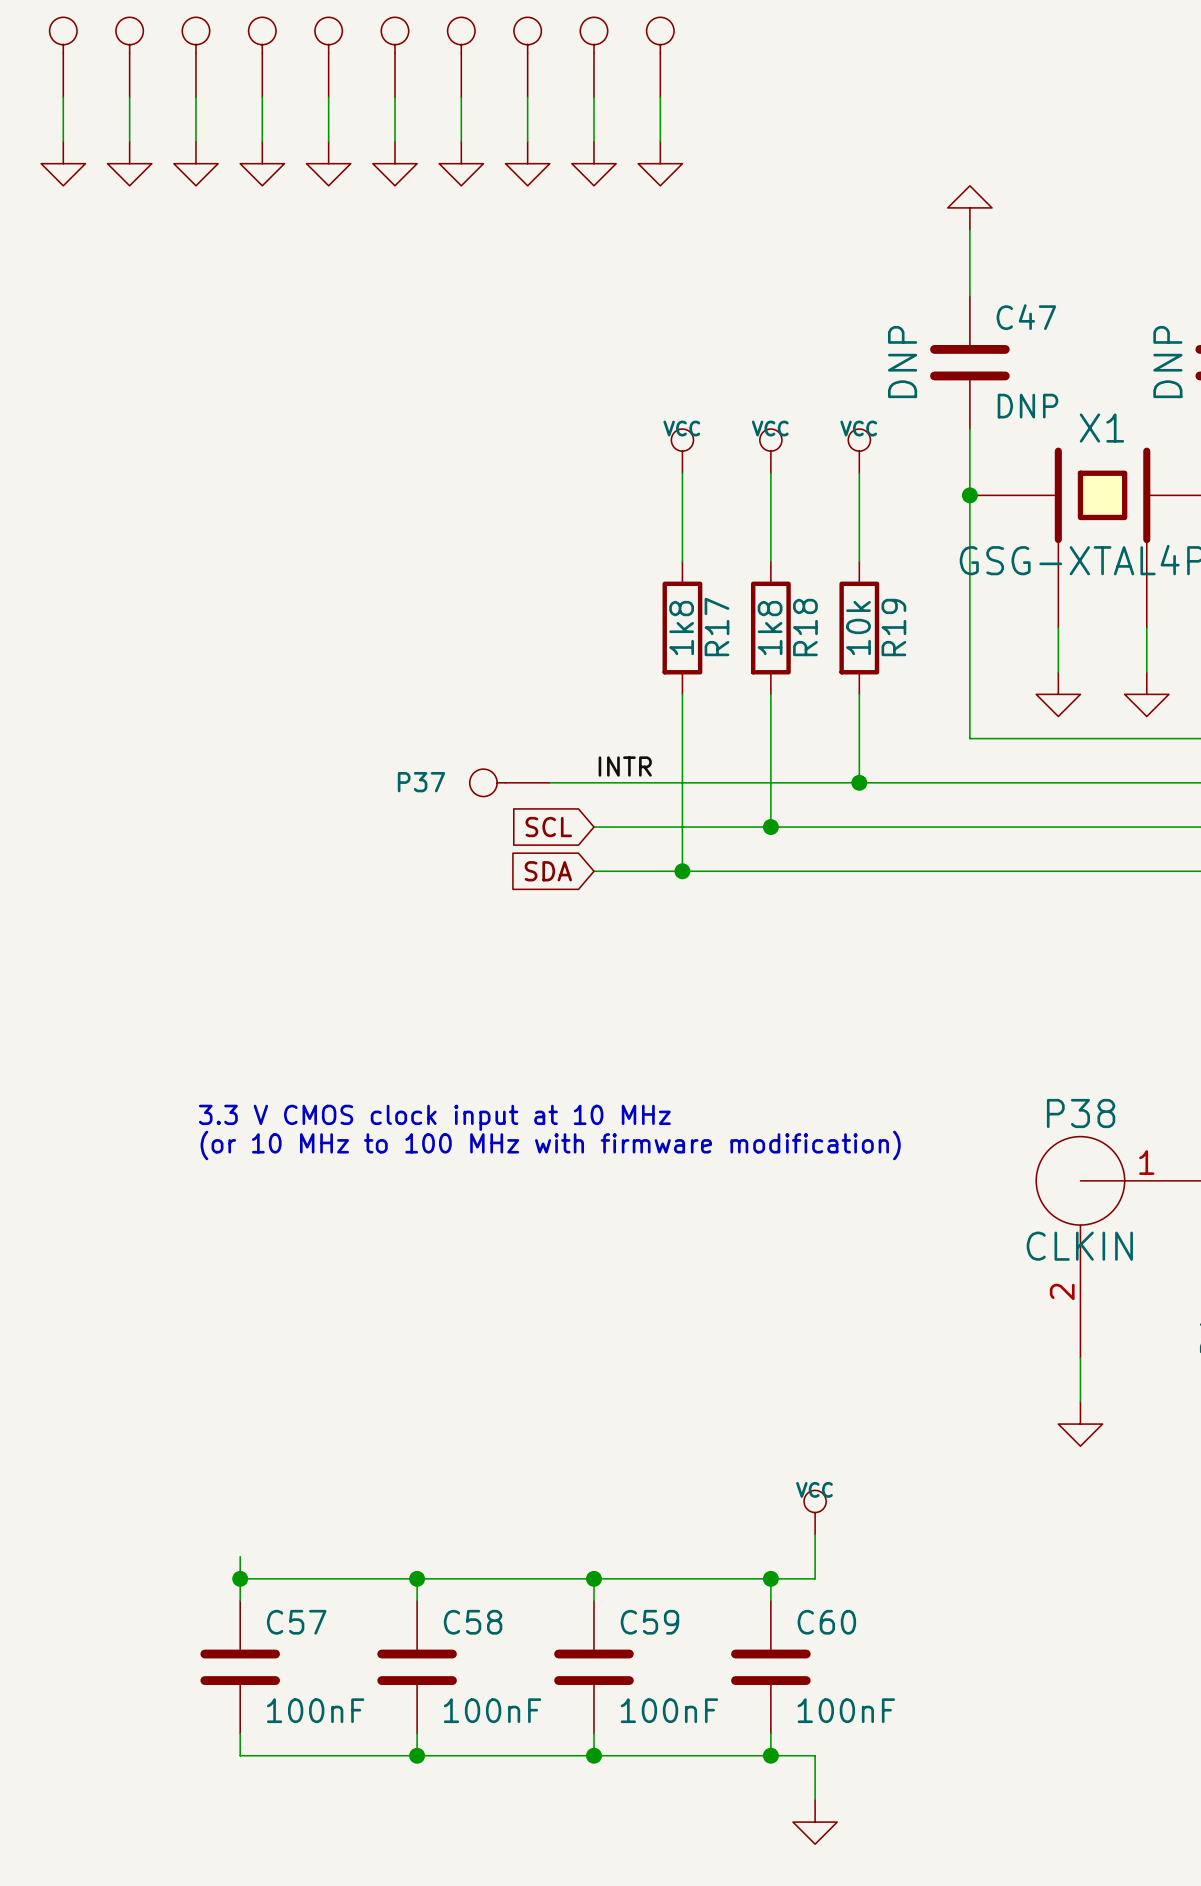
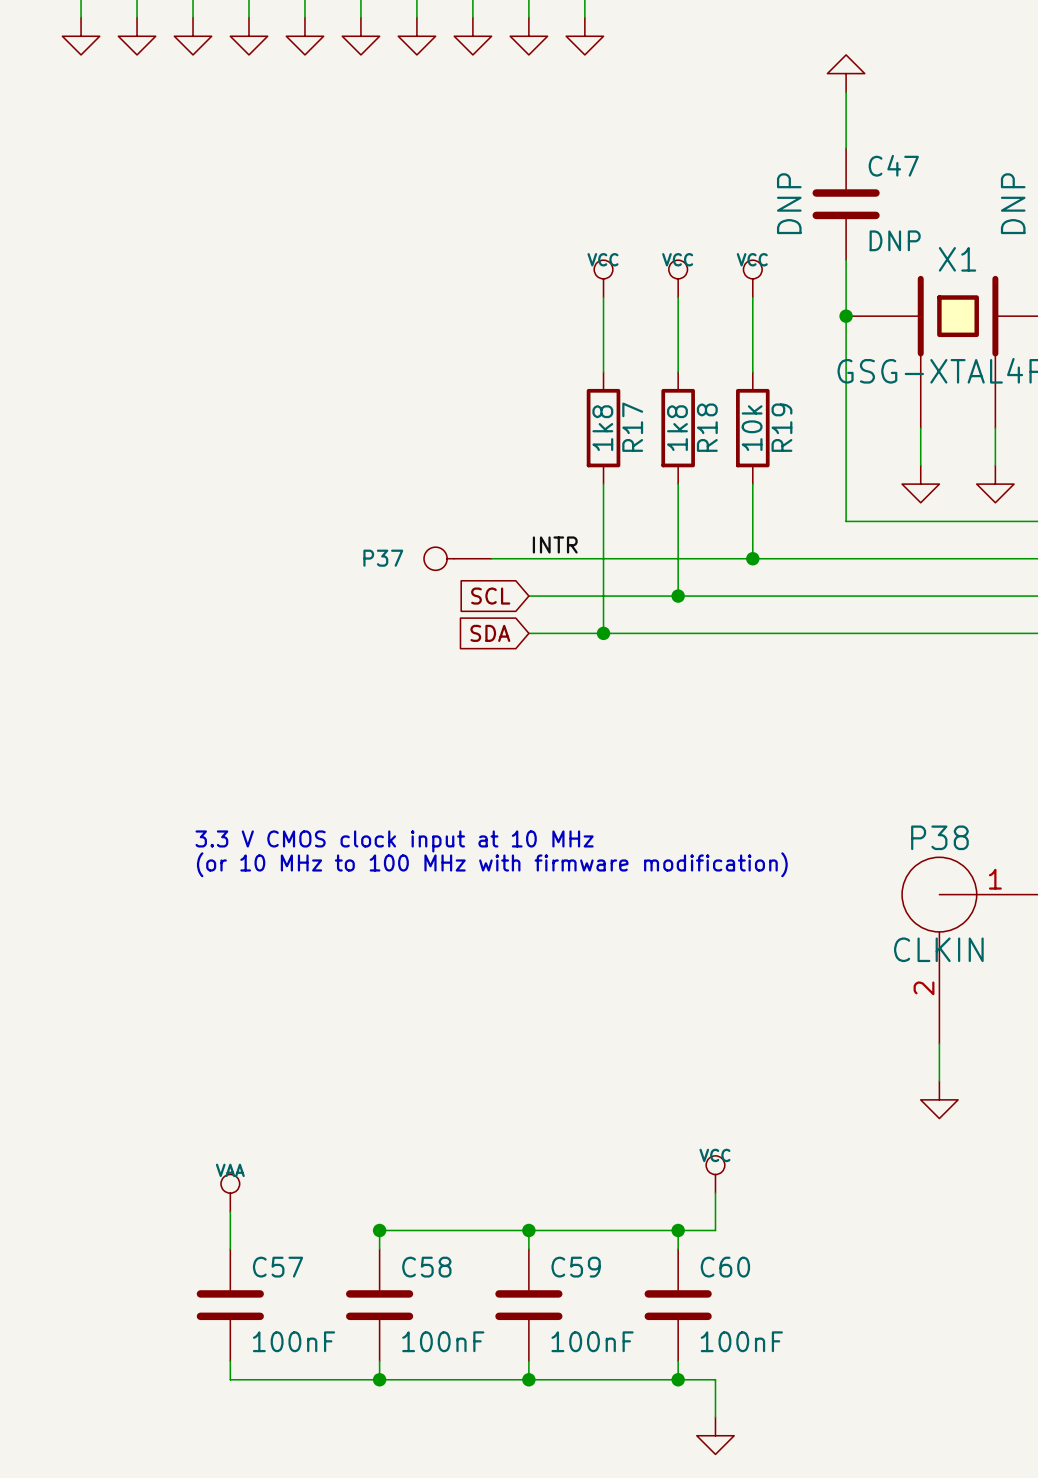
power symbol: none -> VAA (230, 1193)
wire: (240, 1578) (417, 1578) -> none
junction: (240, 1578) -> none

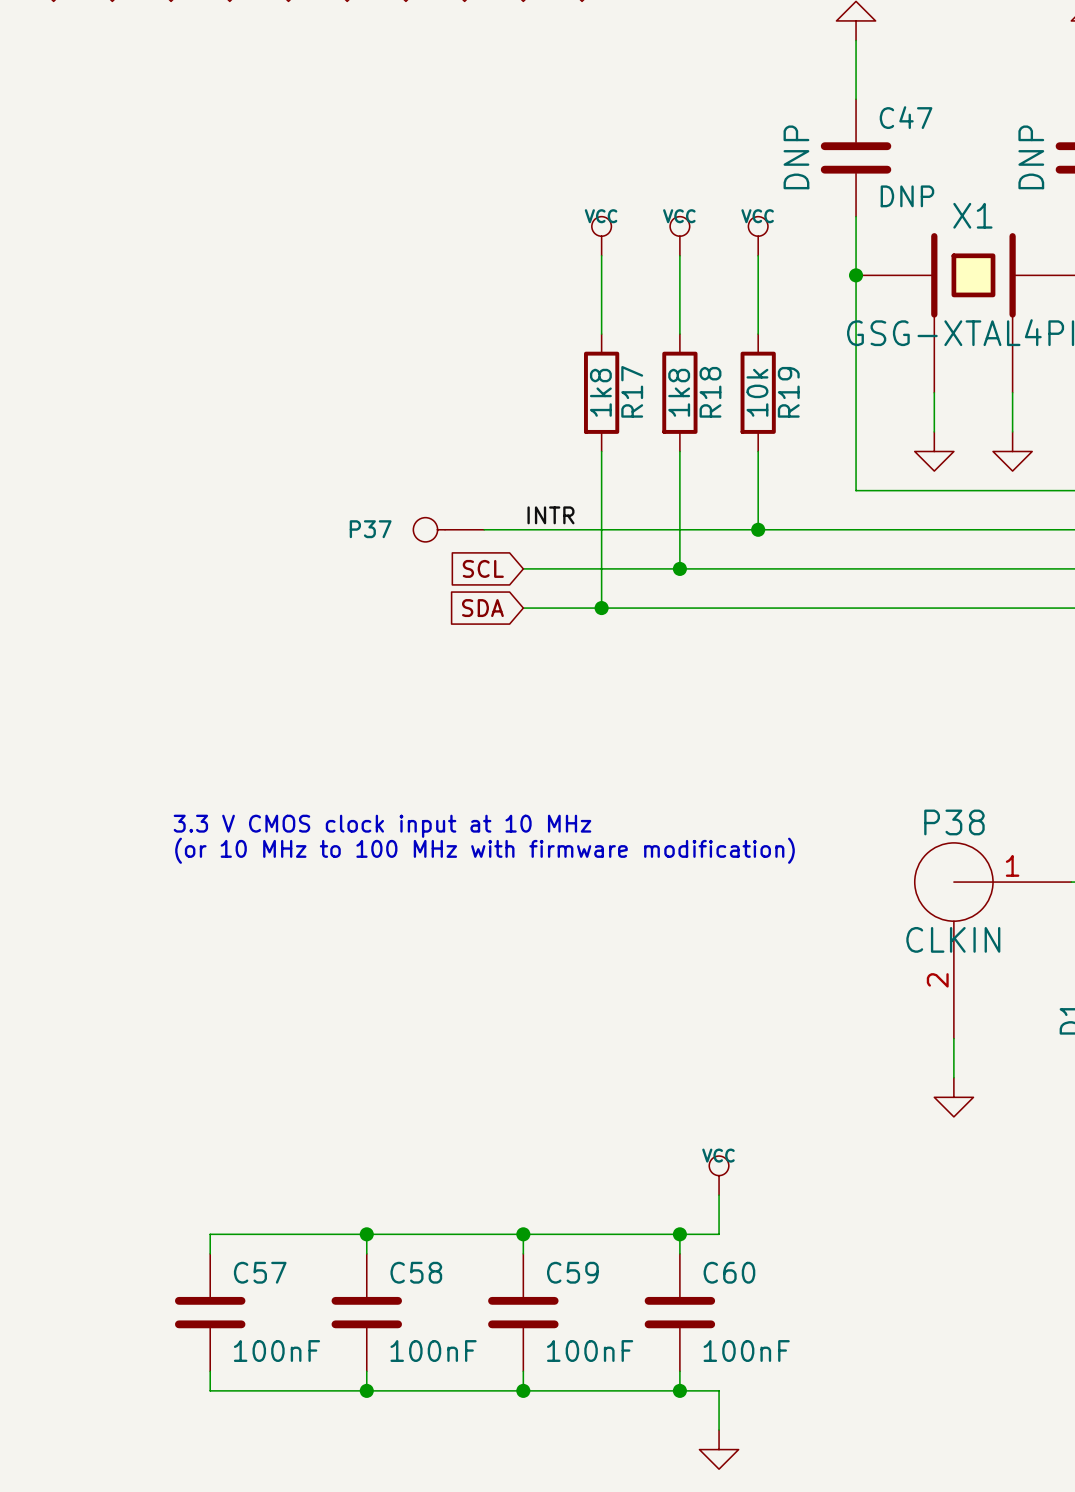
power symbol: VAA (230, 1193) -> none
wire: (230, 1211) (230, 1230) -> (366, 1234) (210, 1234)

